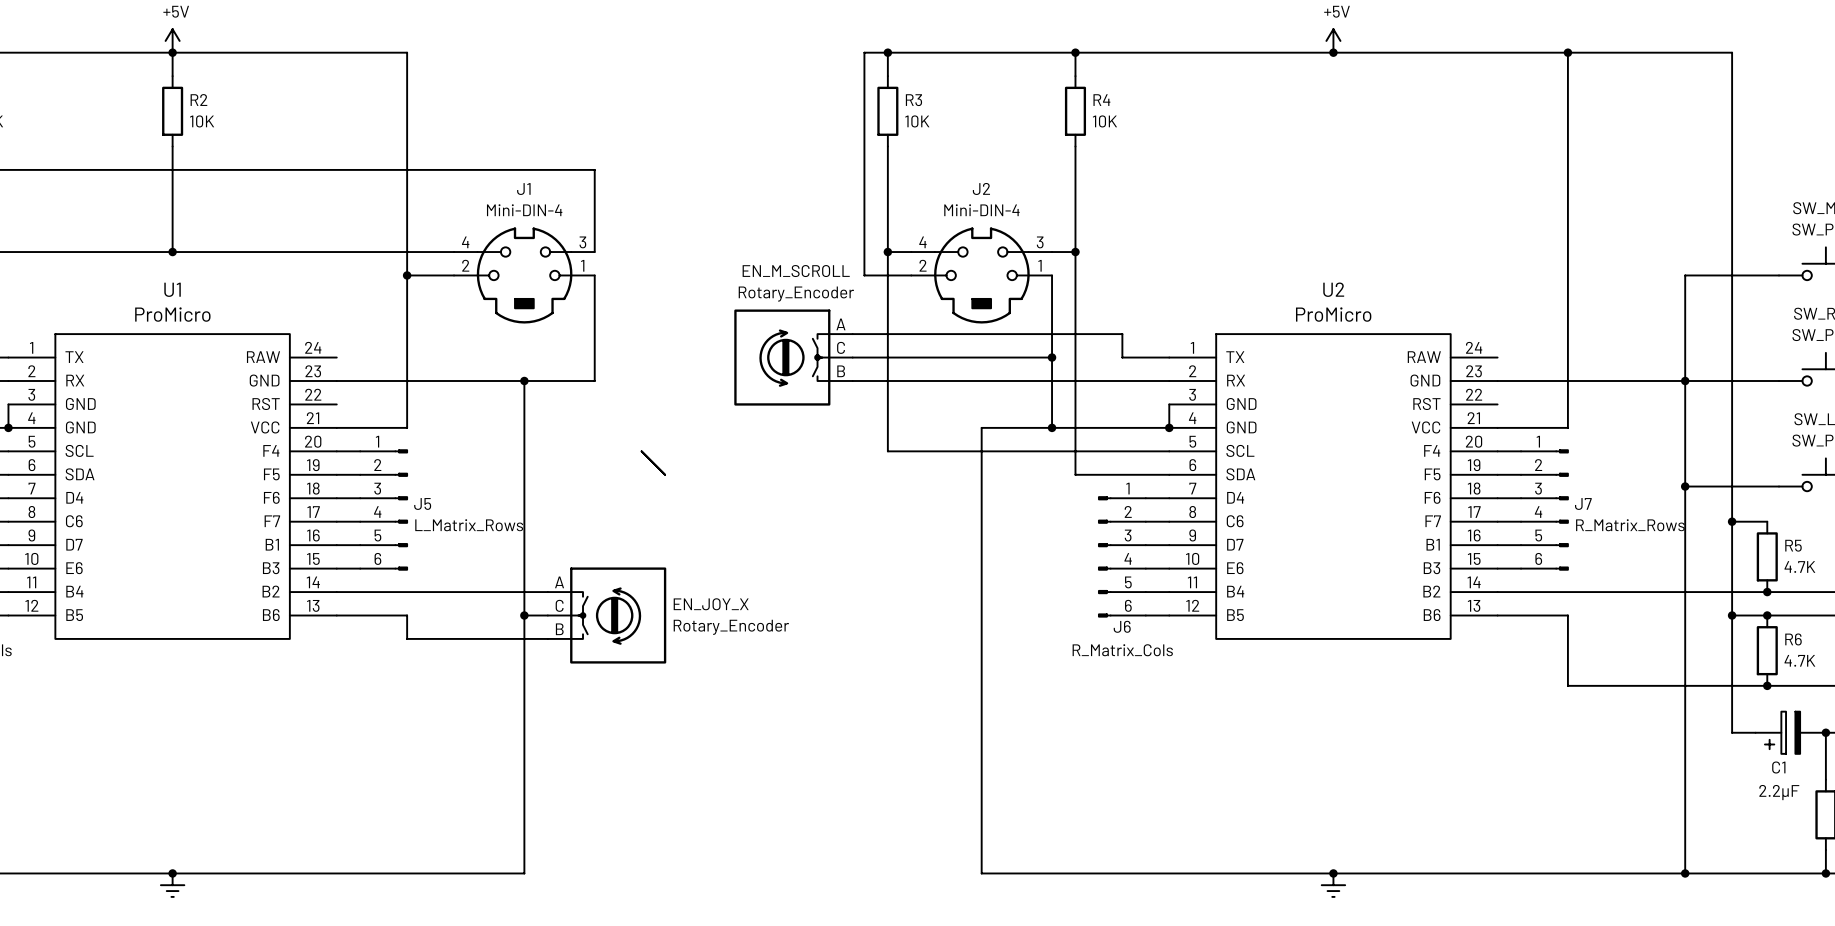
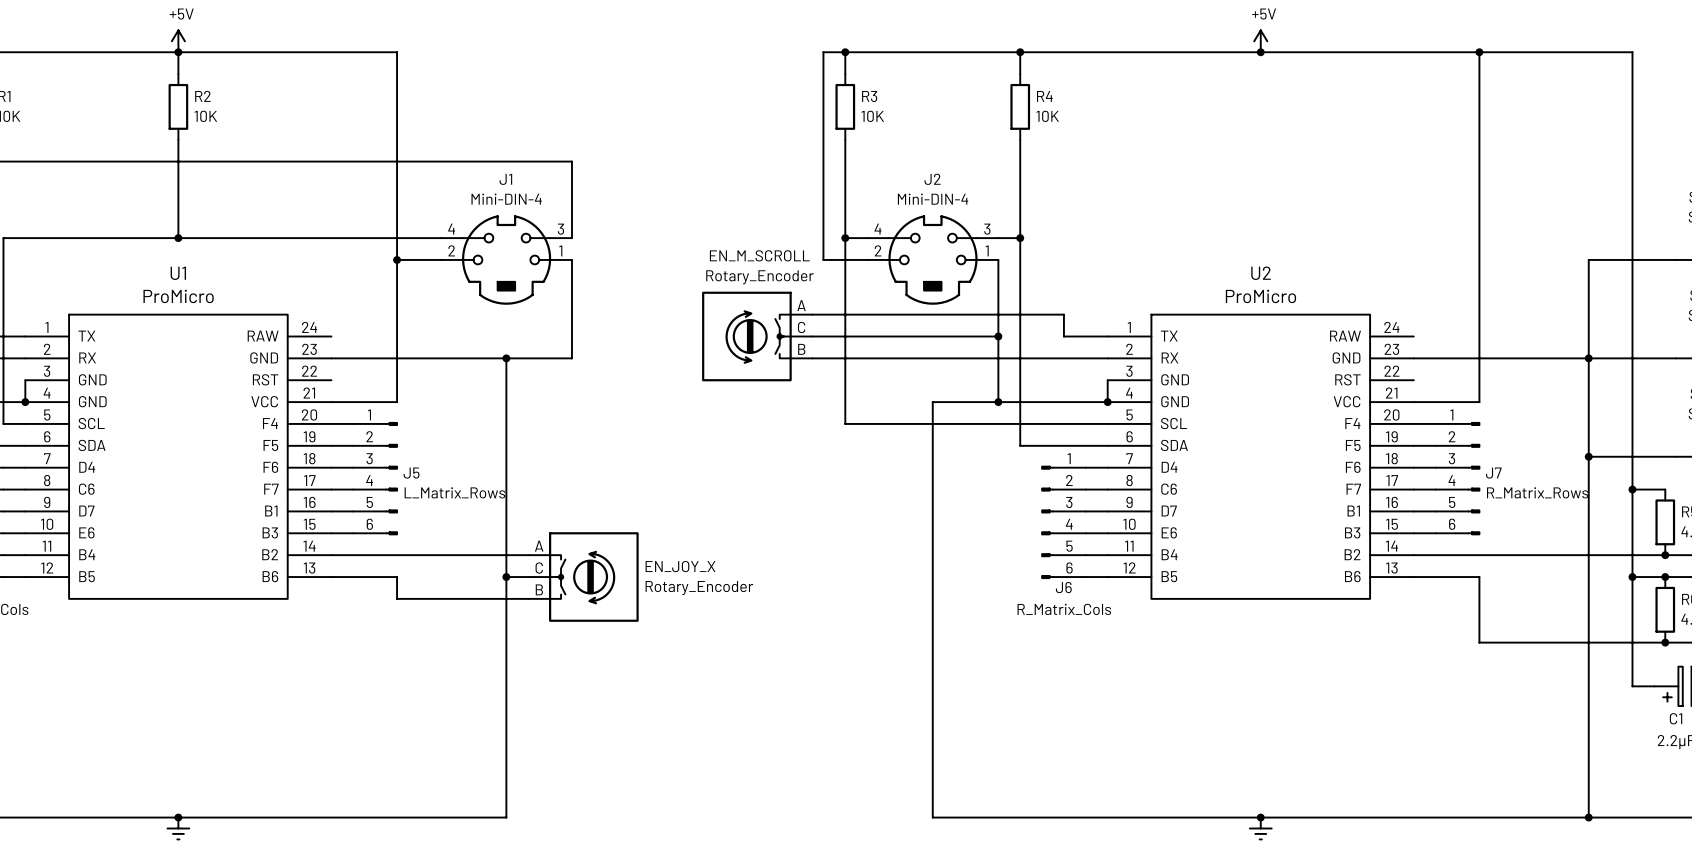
bus: (641, 451) (665, 474) -> none

